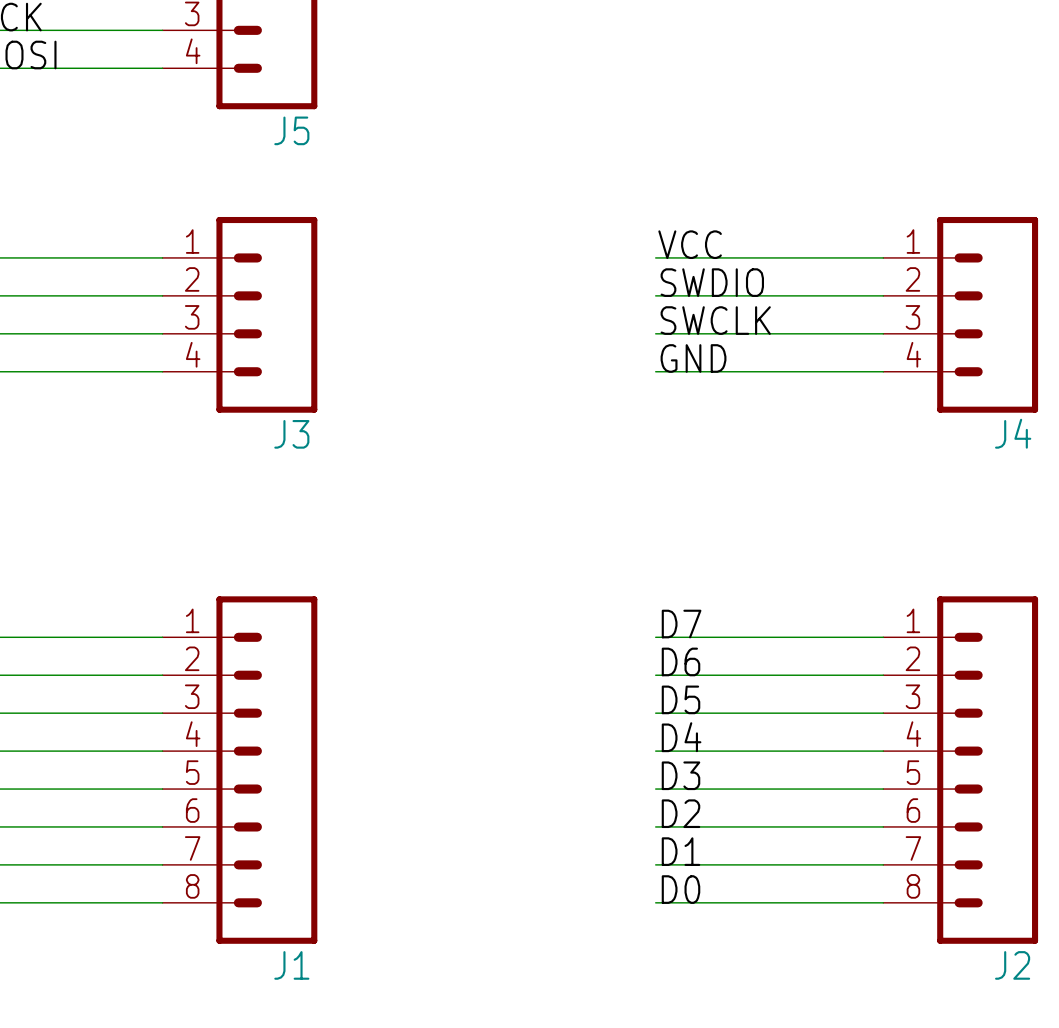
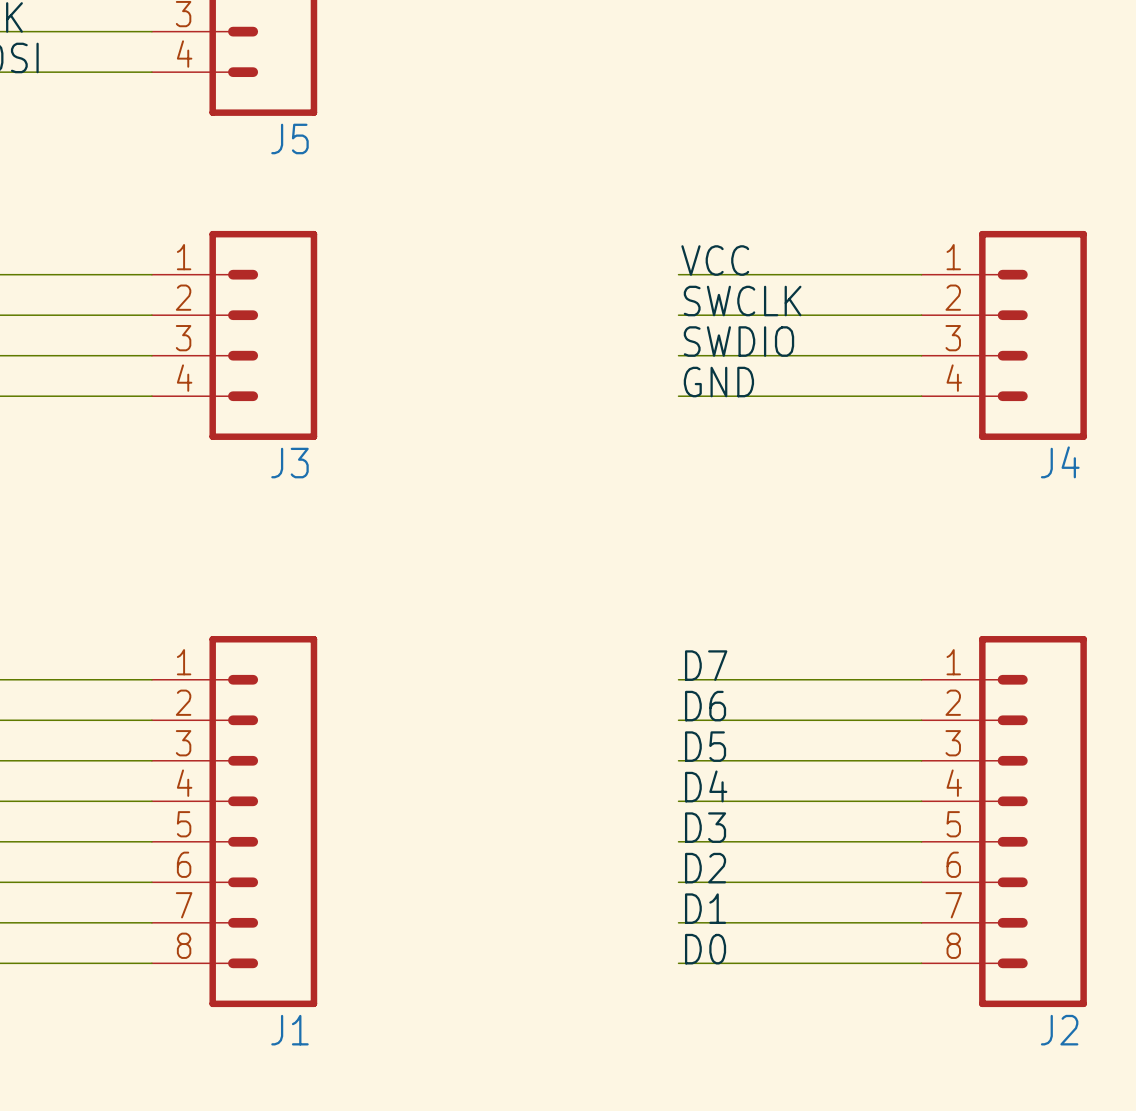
label: SWDIO (712, 282) -> SWCLK (742, 301)
label: SWCLK (715, 320) -> SWDIO (738, 341)

